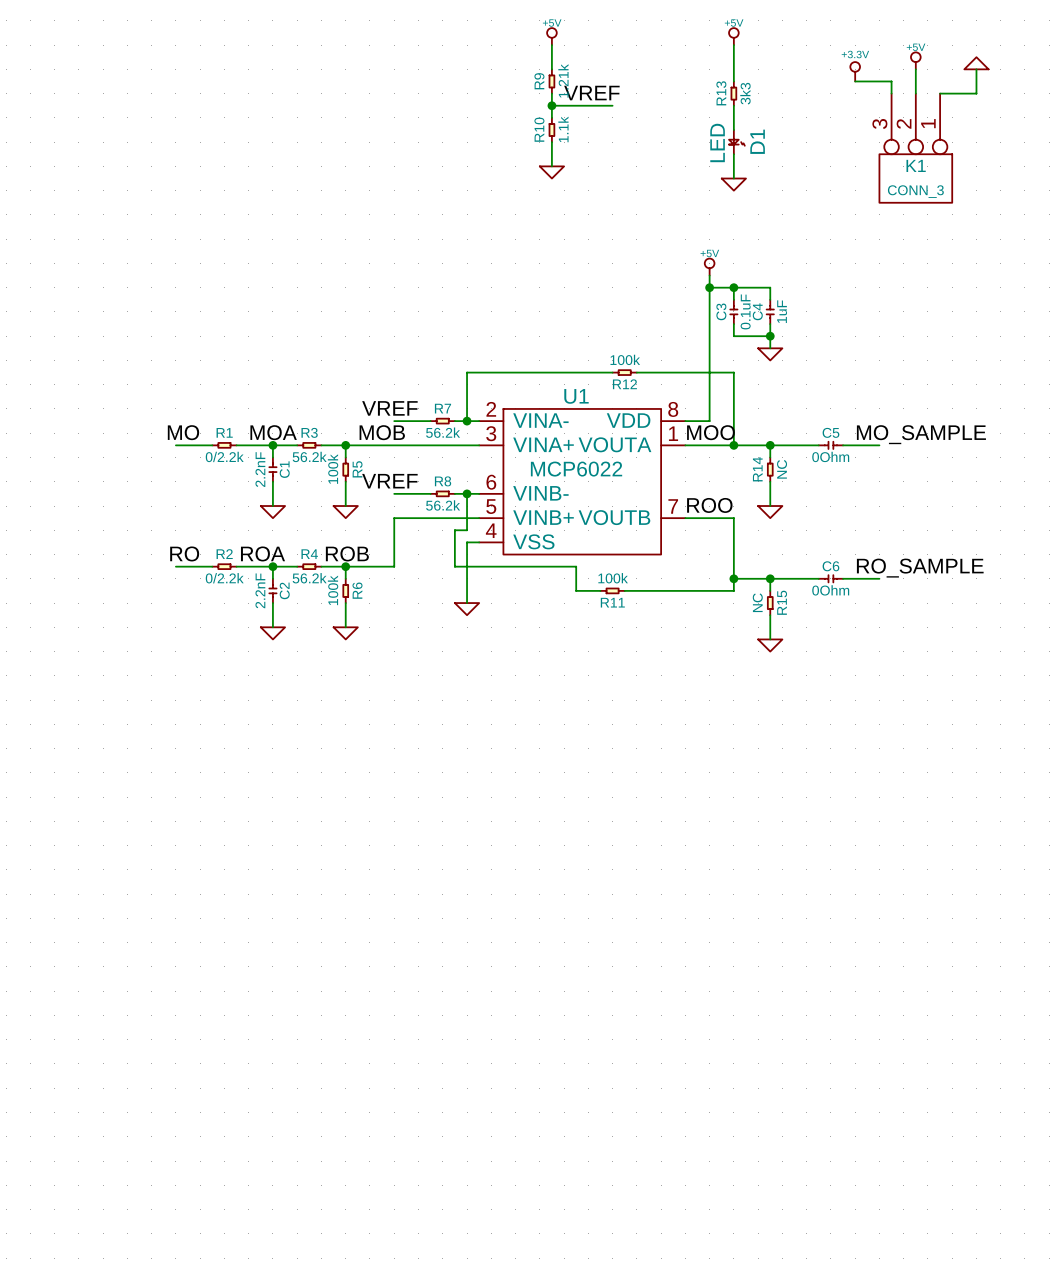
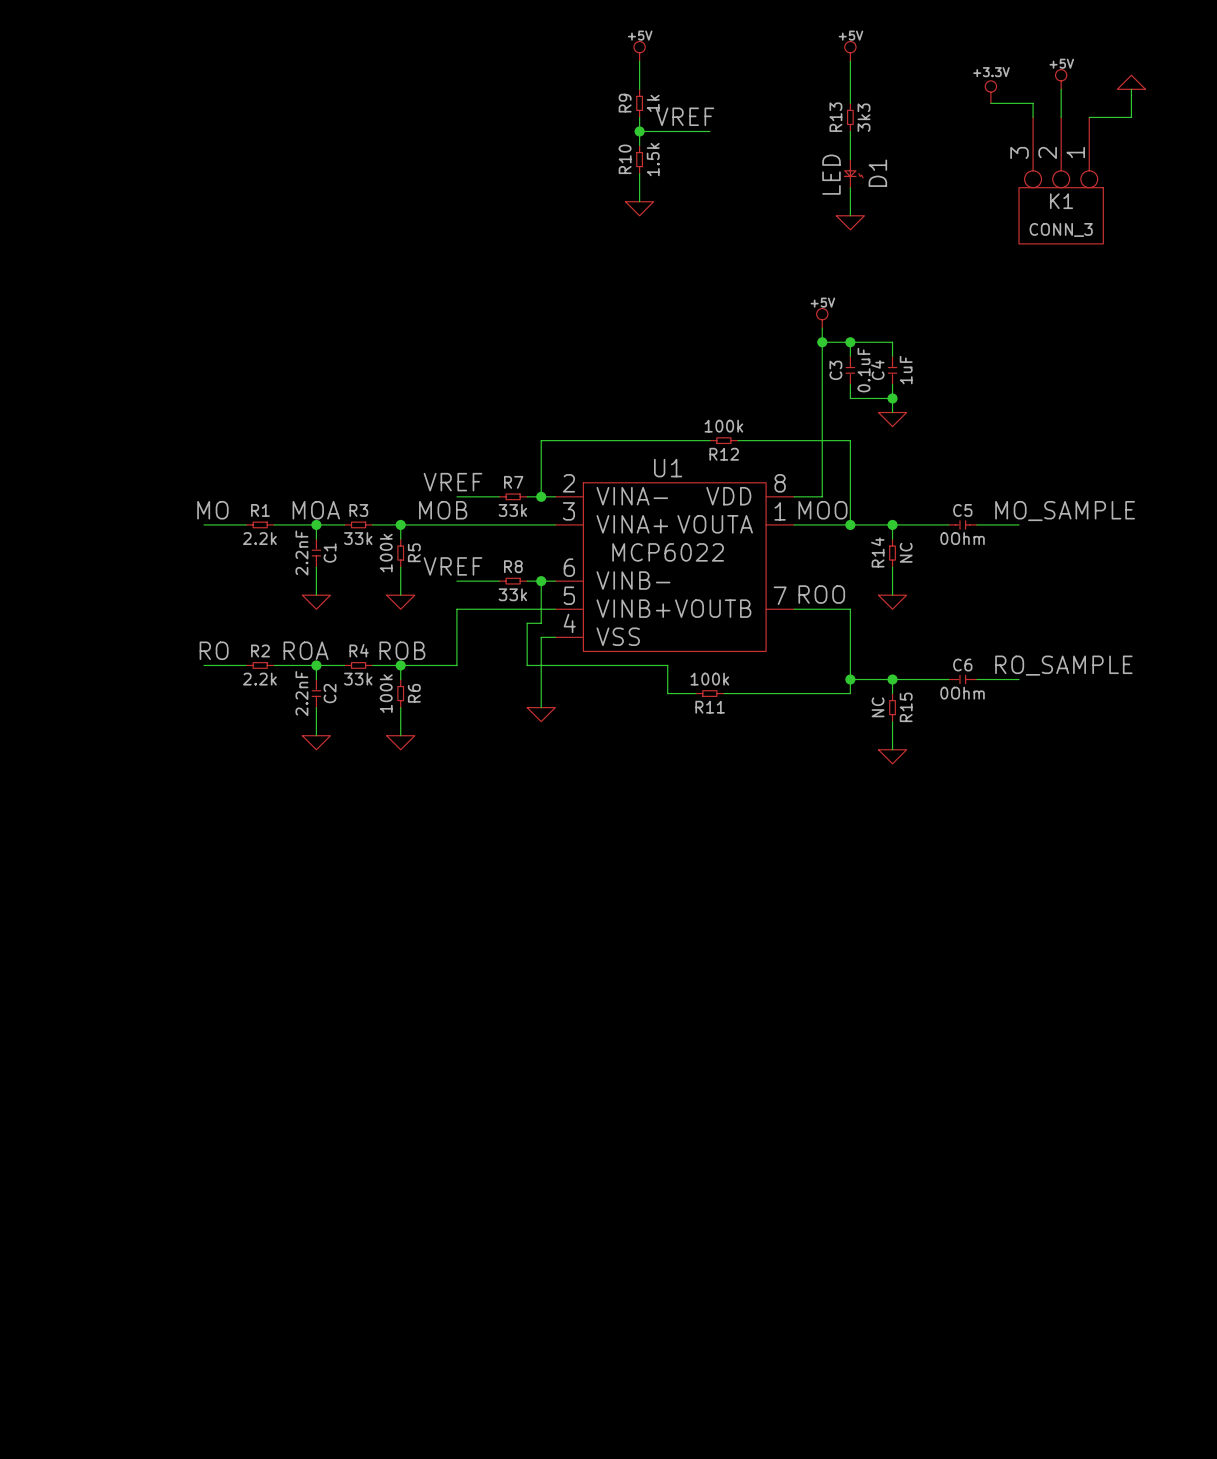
R9 value: 1.21k (563, 80) -> 1k (653, 103)
R10 value: 1.1k (563, 129) -> 1.5k (653, 159)
R7 value: 56.2k (443, 432) -> 33k (512, 510)
R1 value: 0/2.2k (224, 456) -> 2.2k (259, 538)
R3 value: 56.2k (309, 456) -> 33k (358, 538)
R8 value: 56.2k (443, 505) -> 33k (512, 594)
R2 value: 0/2.2k (224, 578) -> 2.2k (259, 679)
R4 value: 56.2k (309, 578) -> 33k (358, 679)

